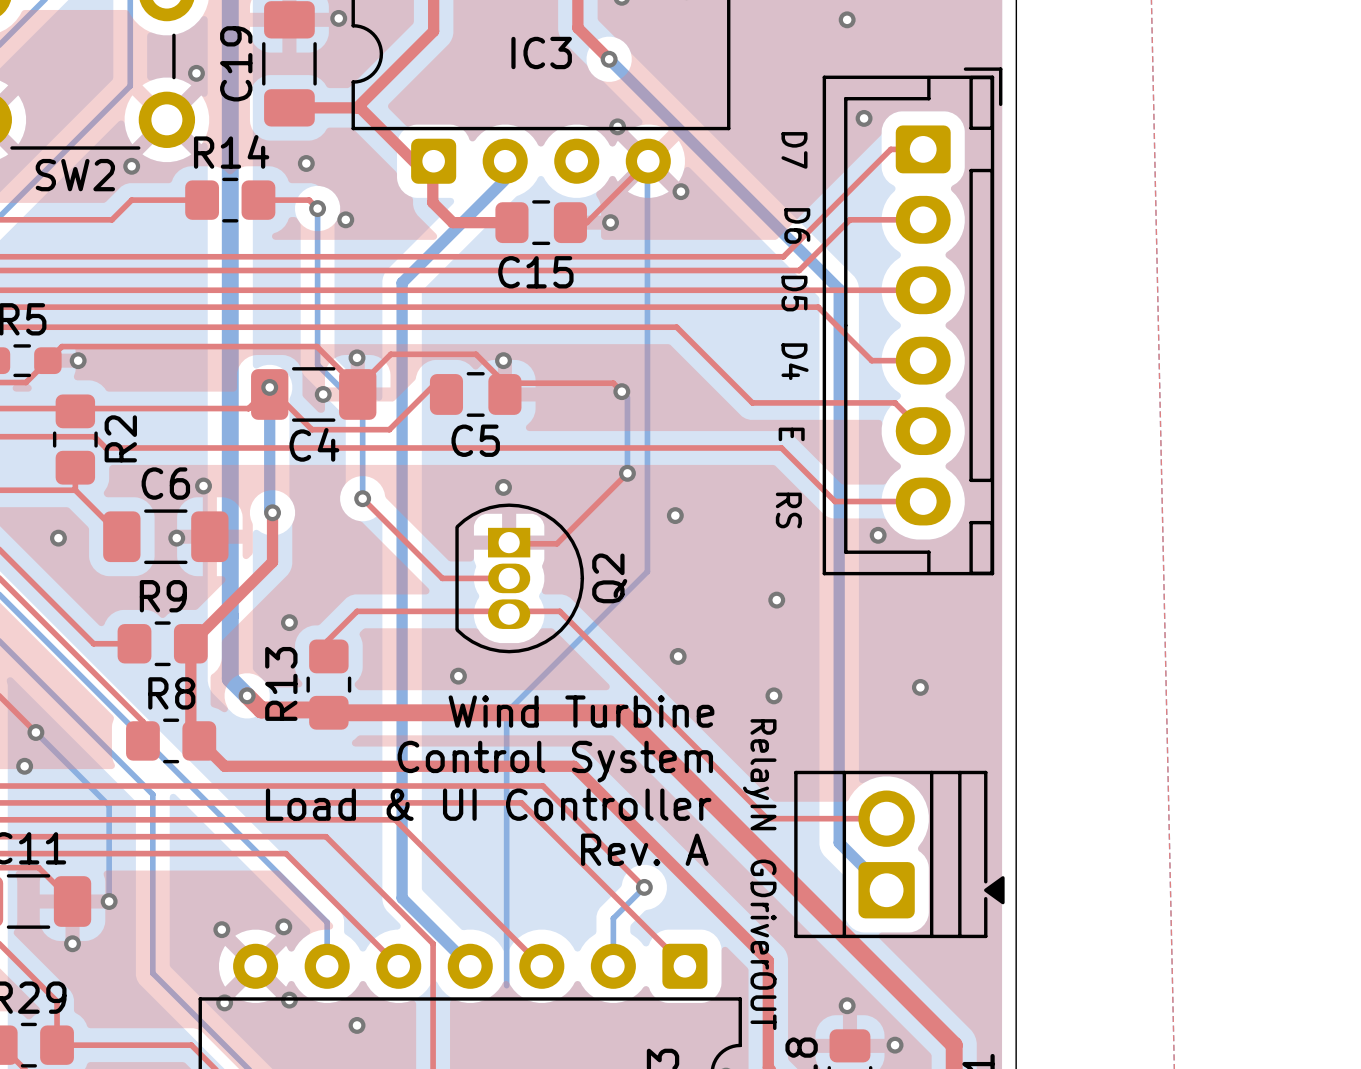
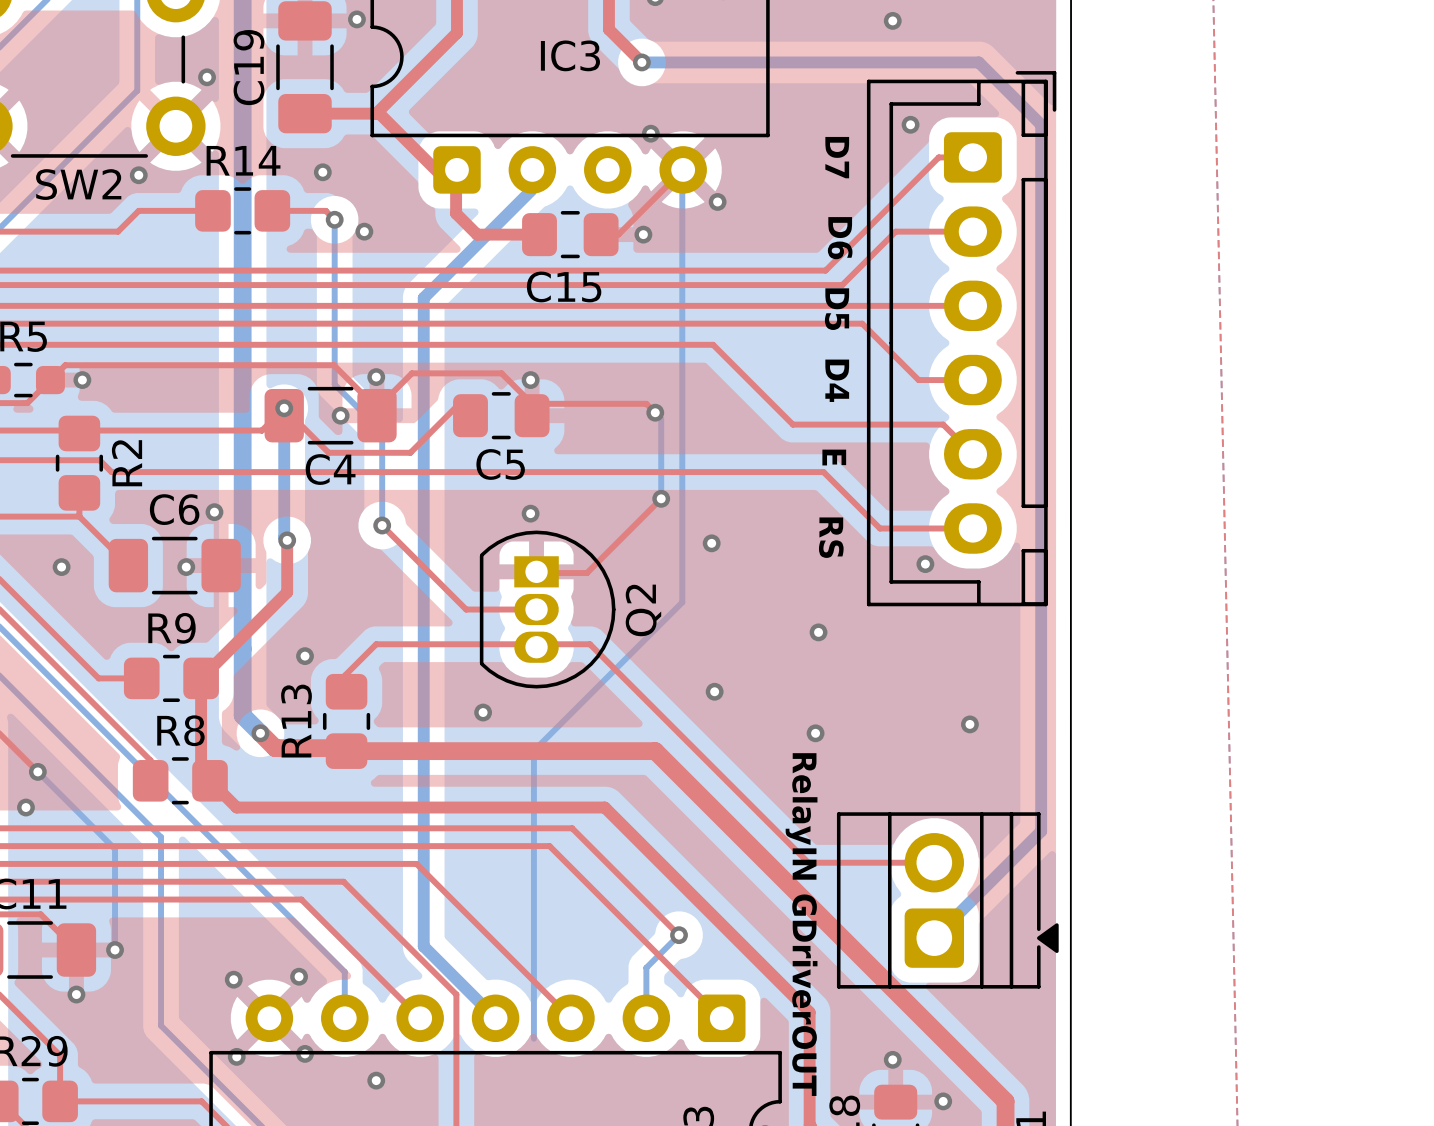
bottom track: (609, 59) (839, 289) (839, 842) (886, 890) -> (641, 62) (978, 62) (1041, 124) (1041, 831) (934, 938)
text: Wind Turbine (581, 711) -> none
text: Control System (555, 761) -> none
text: Load & UI Controller (488, 804) -> none
text: Rev. A (644, 849) -> none

